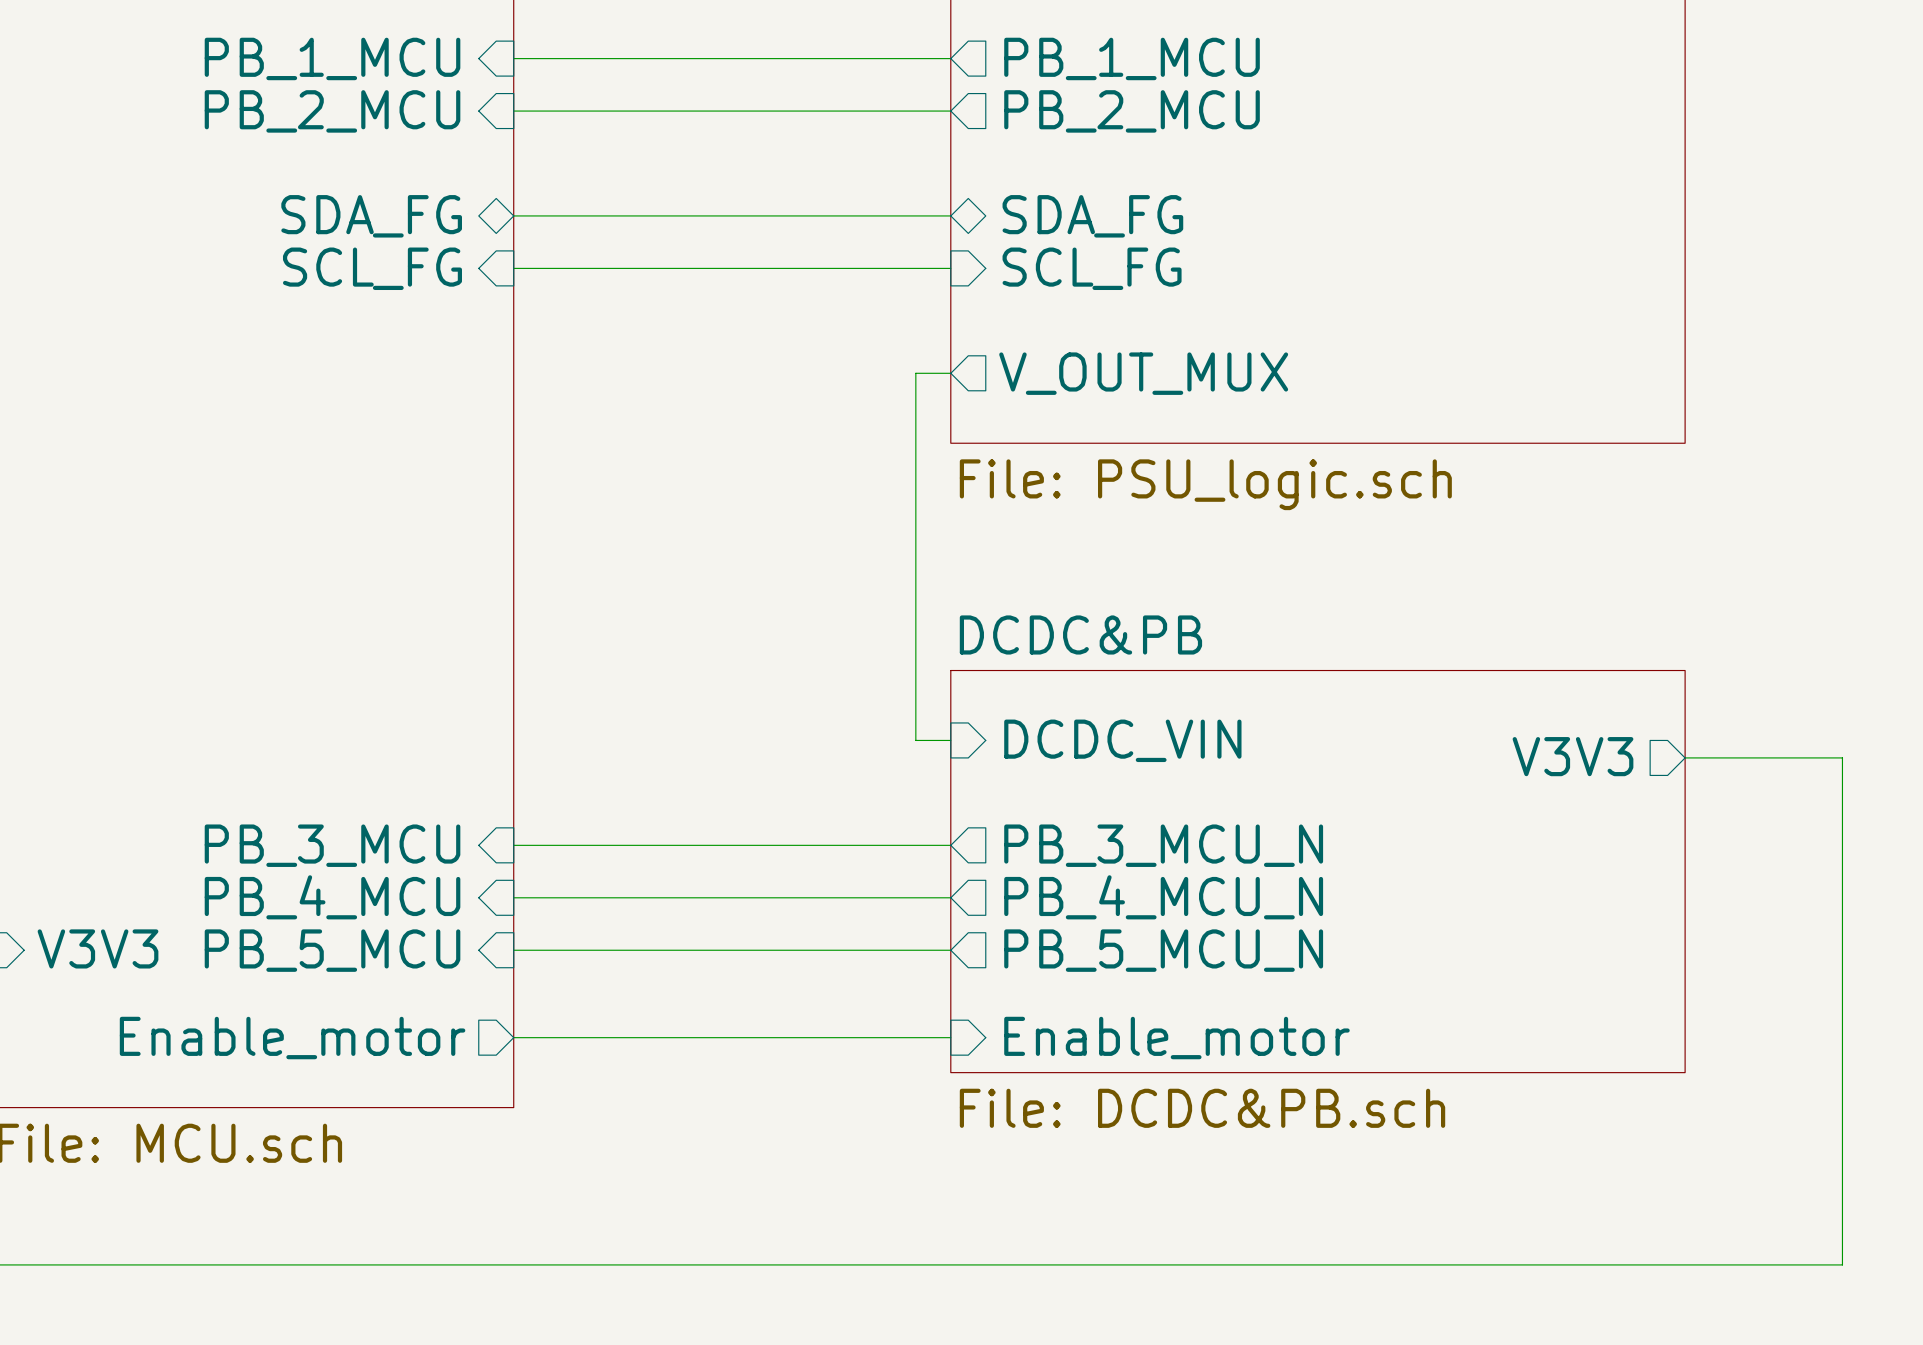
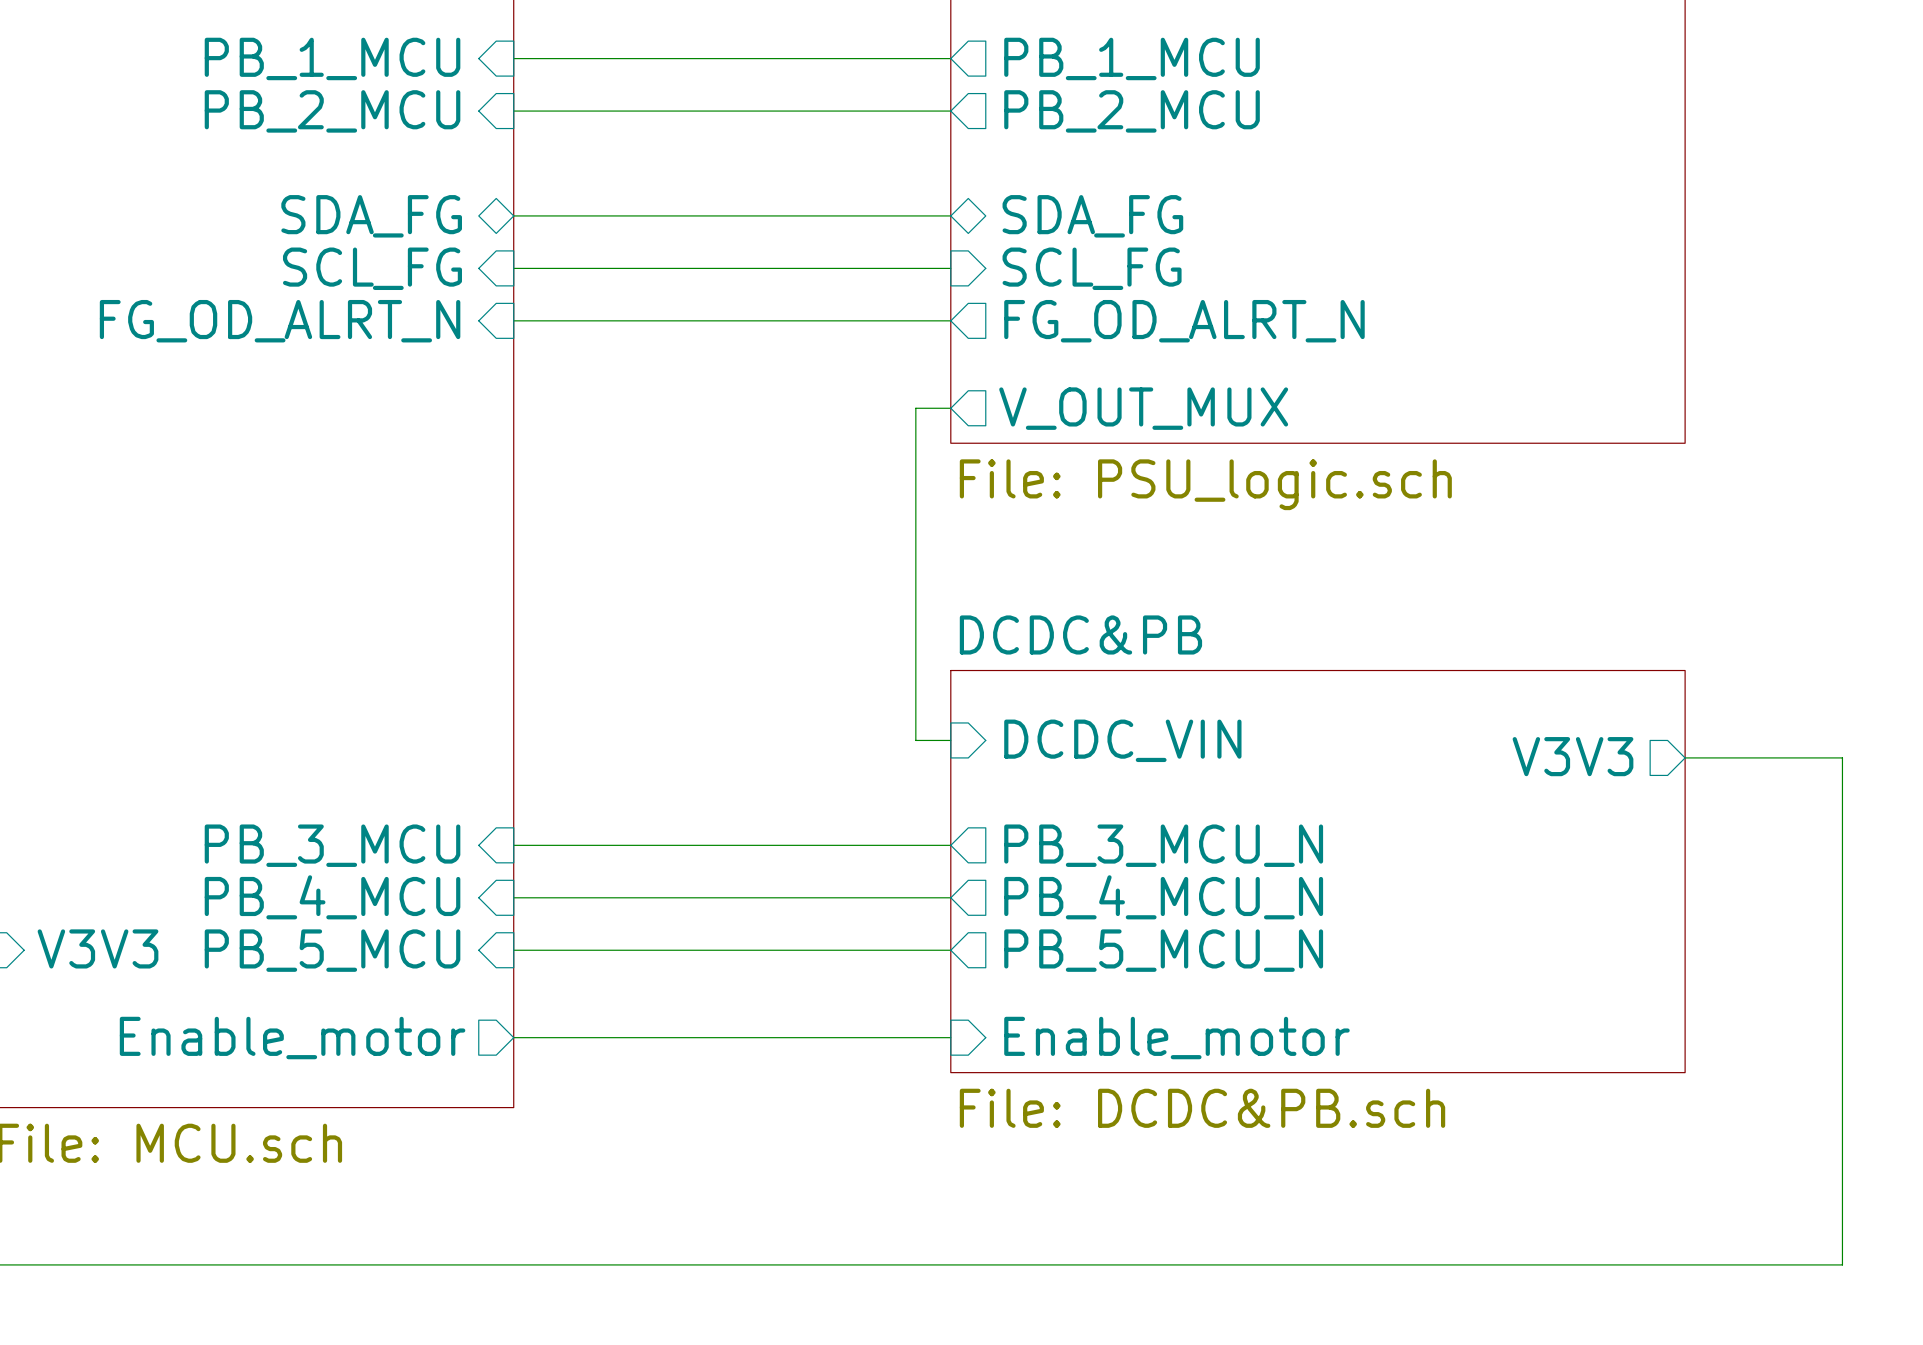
wire: none -> (513, 320) (950, 320)
sheet pin: none -> FG_OD_ALRT_N (280, 321)
sheet pin: none -> FG_OD_ALRT_N (1184, 321)
wire: (950, 373) (915, 373) (915, 408) -> (950, 408) (915, 408)
sheet pin position: V_OUT_MUX (1143, 373) -> V_OUT_MUX (1143, 408)

